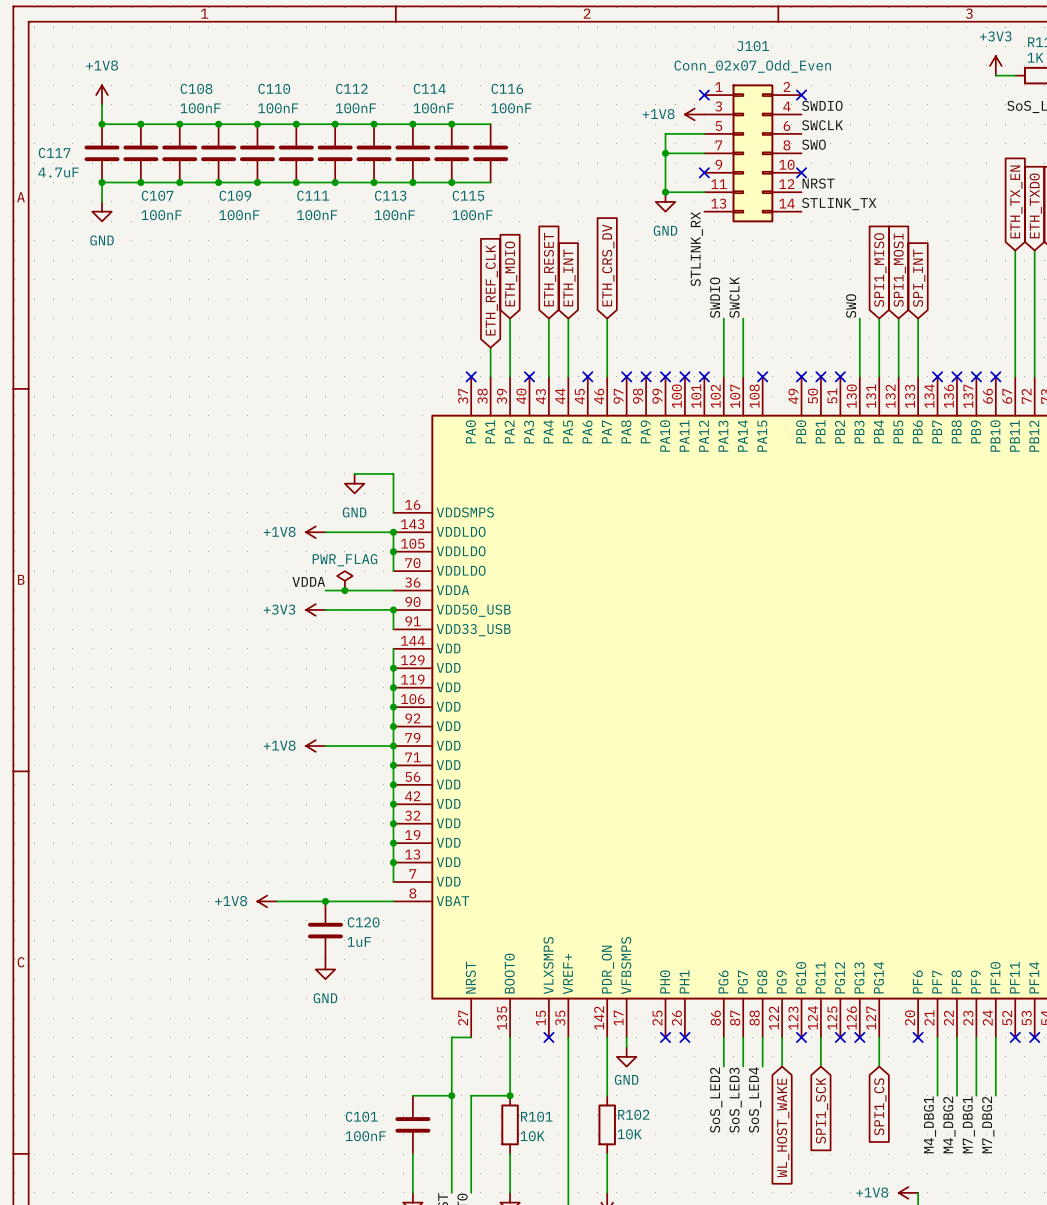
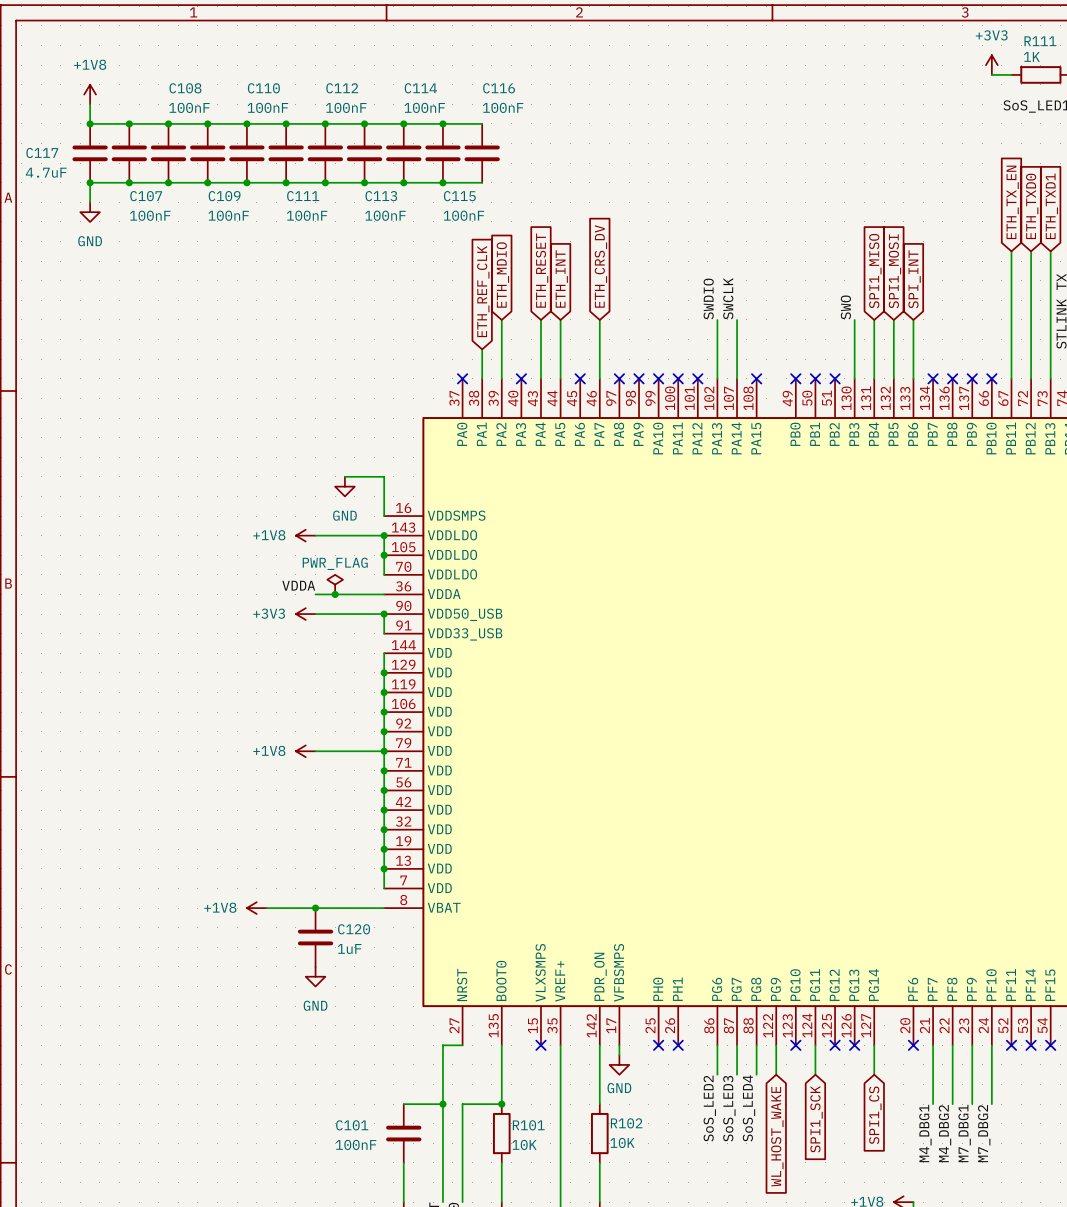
no-connect mark: (704, 95) -> none
no-connect mark: (801, 95) -> none
label: SWDIO (822, 105) -> none
power symbol: +1V8 (694, 114) -> none
label: SWCLK (822, 125) -> none
wire: (704, 133) (665, 133) (665, 192) (704, 192) -> none
label: SWO (813, 144) -> none
wire: (665, 153) (704, 153) -> none
junction: (665, 153) -> none
J101: Conn_02x07_Odd_Even (752, 153) -> none
no-connect mark: (704, 172) -> none
no-connect mark: (801, 172) -> none
label: NRST (818, 183) -> none
junction: (665, 192) -> none
power symbol: GND (665, 201) -> none
label: STLINK_TX (839, 204) -> none
label: STLINK_RX (696, 249) -> none

